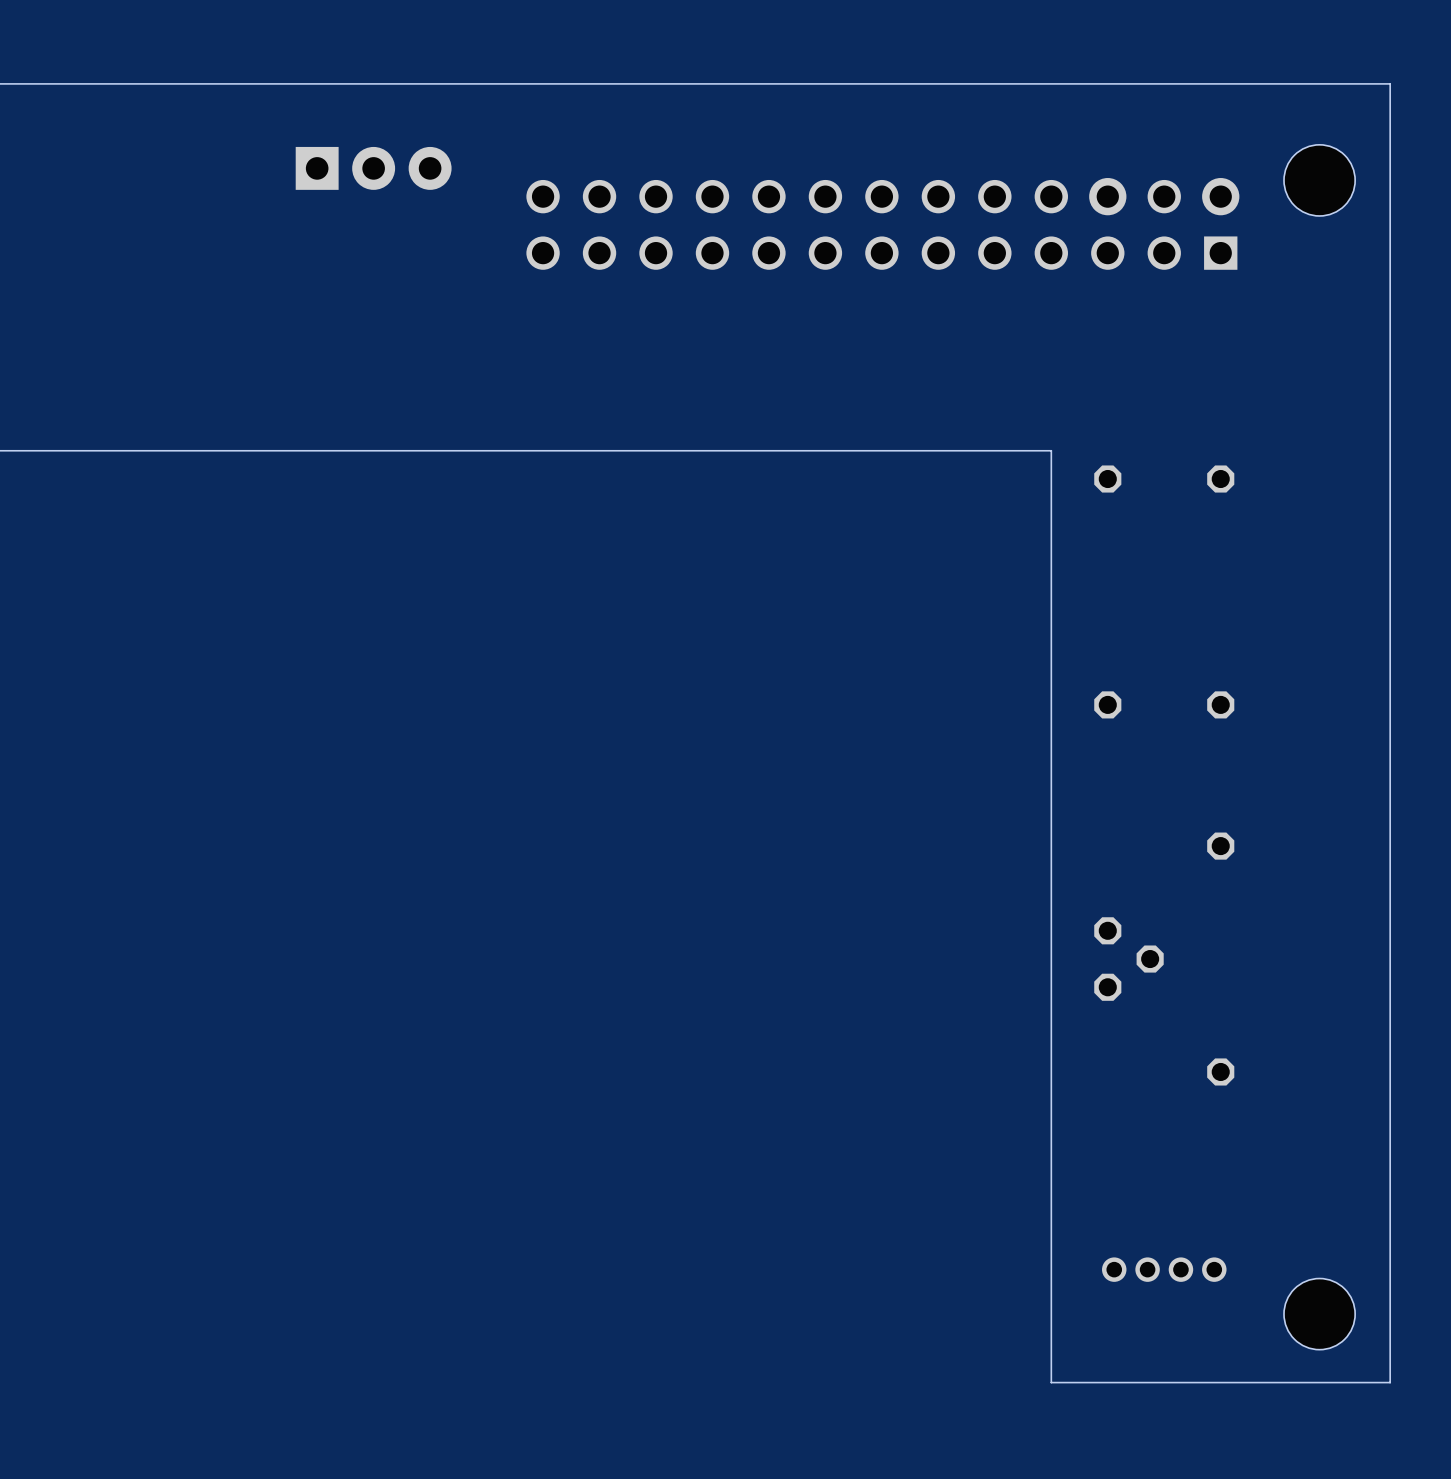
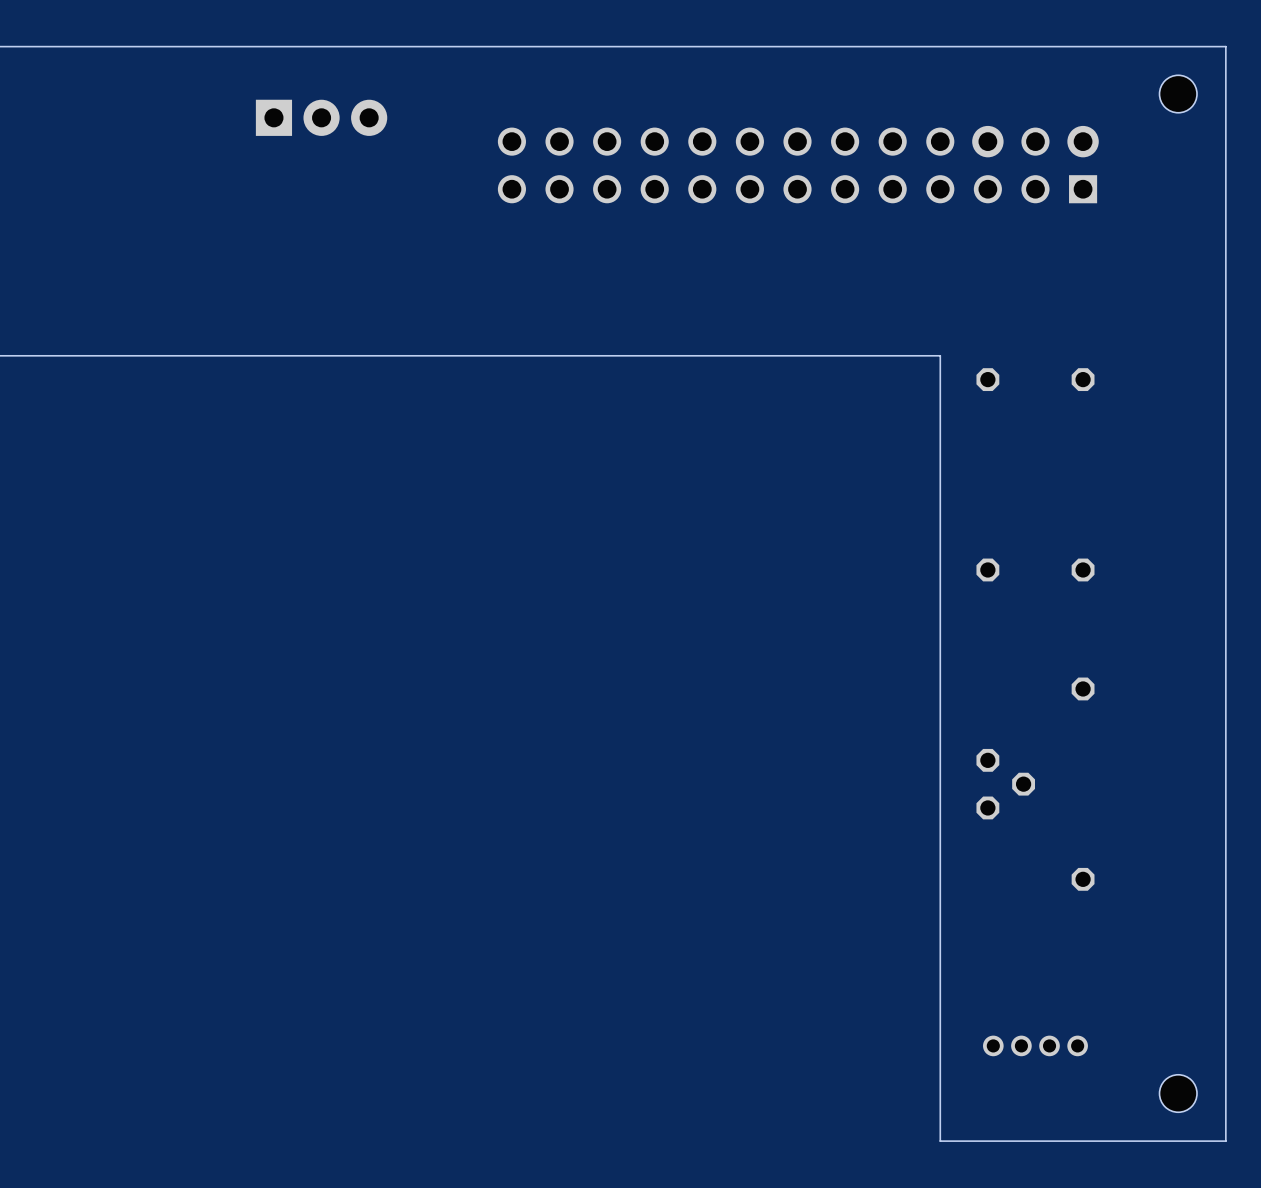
hole: none -> (1178, 94)
part position: (373, 168) -> (321, 117)
hole: (1319, 180) -> none
hole size: [1283, 1278, 1356, 1350] -> [1159, 1074, 1198, 1113]

